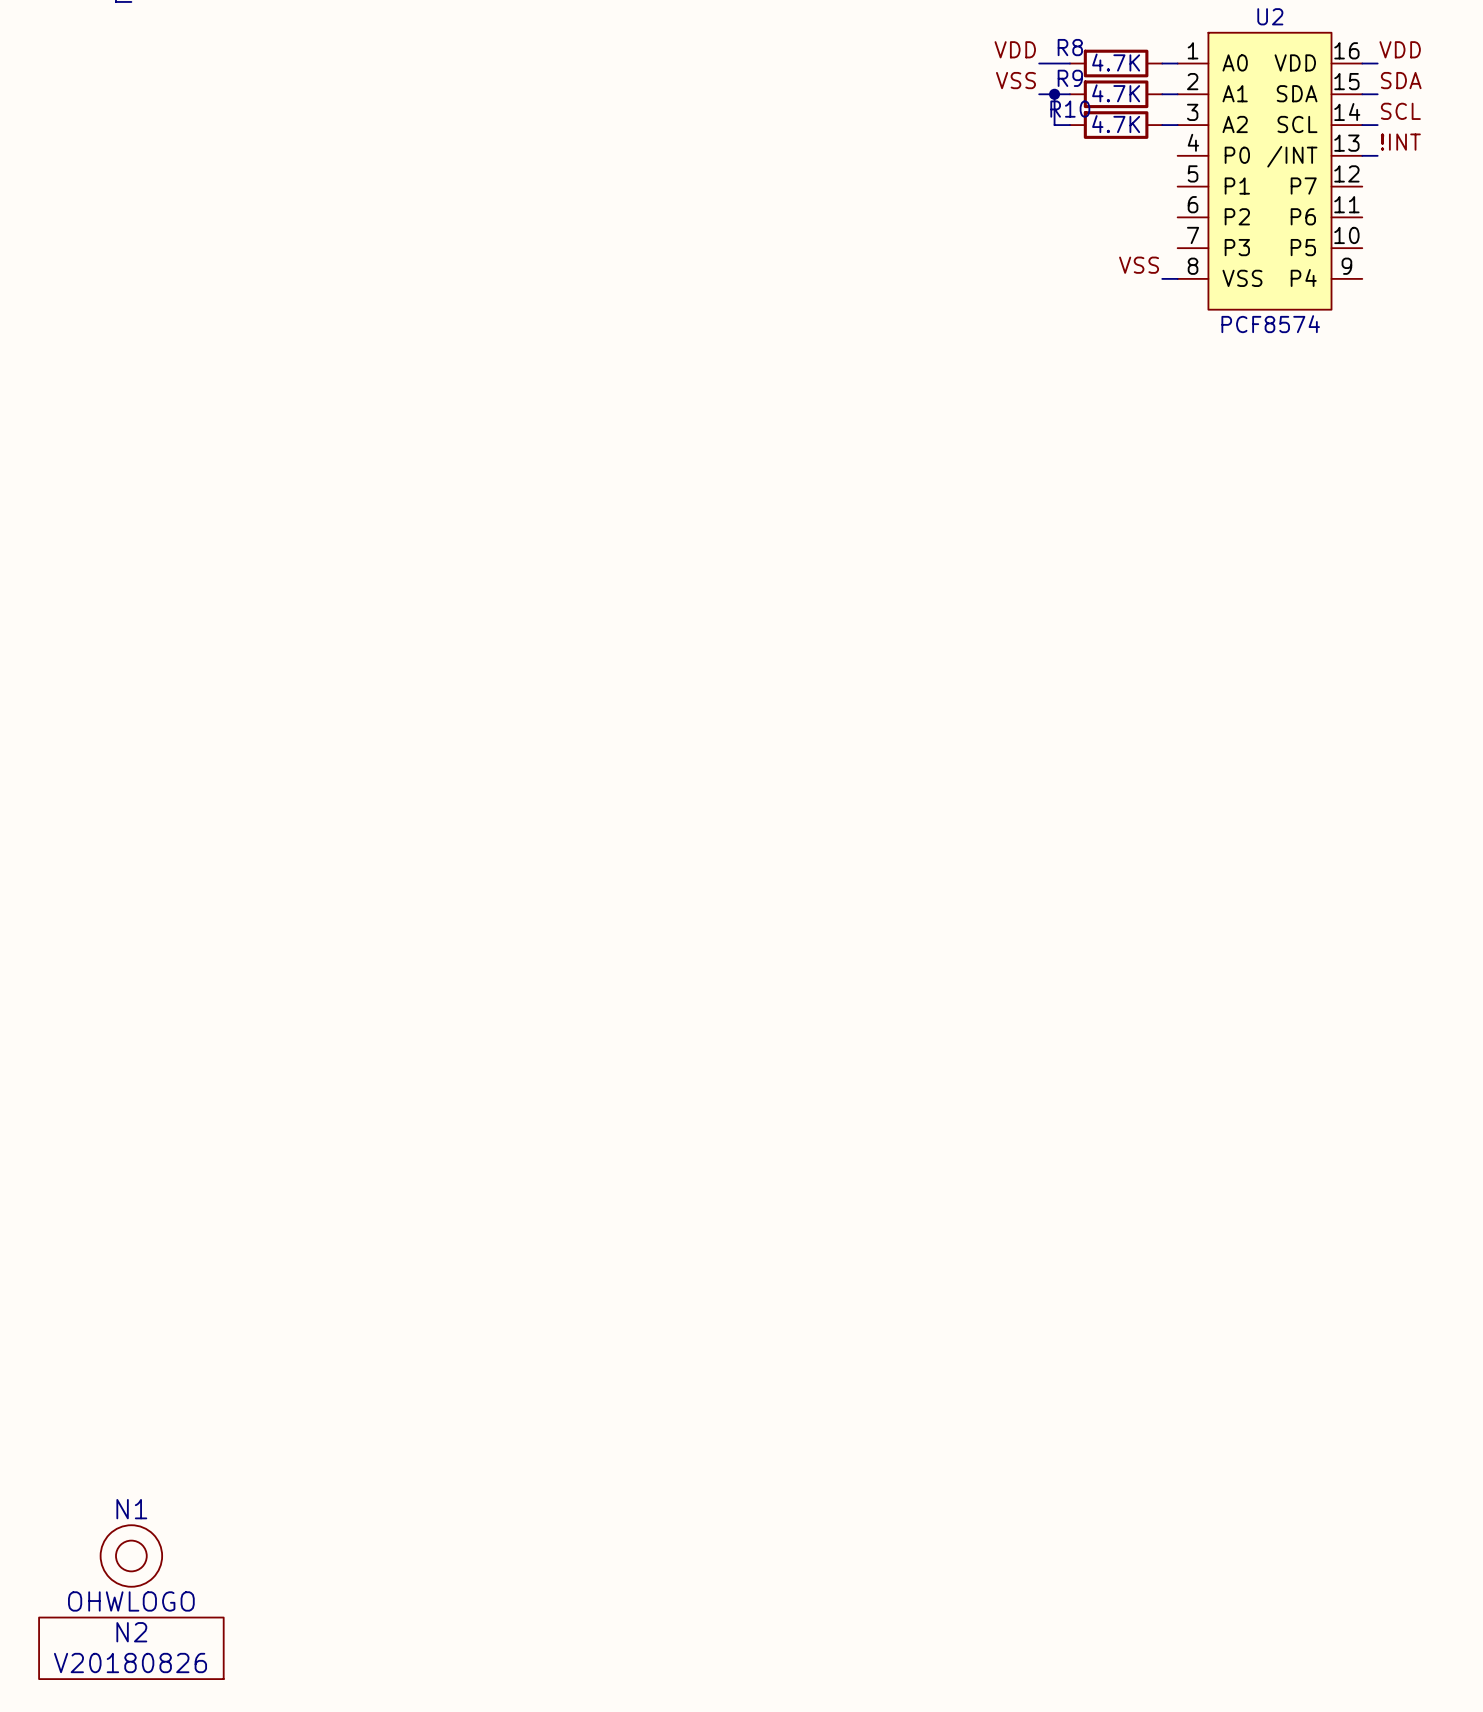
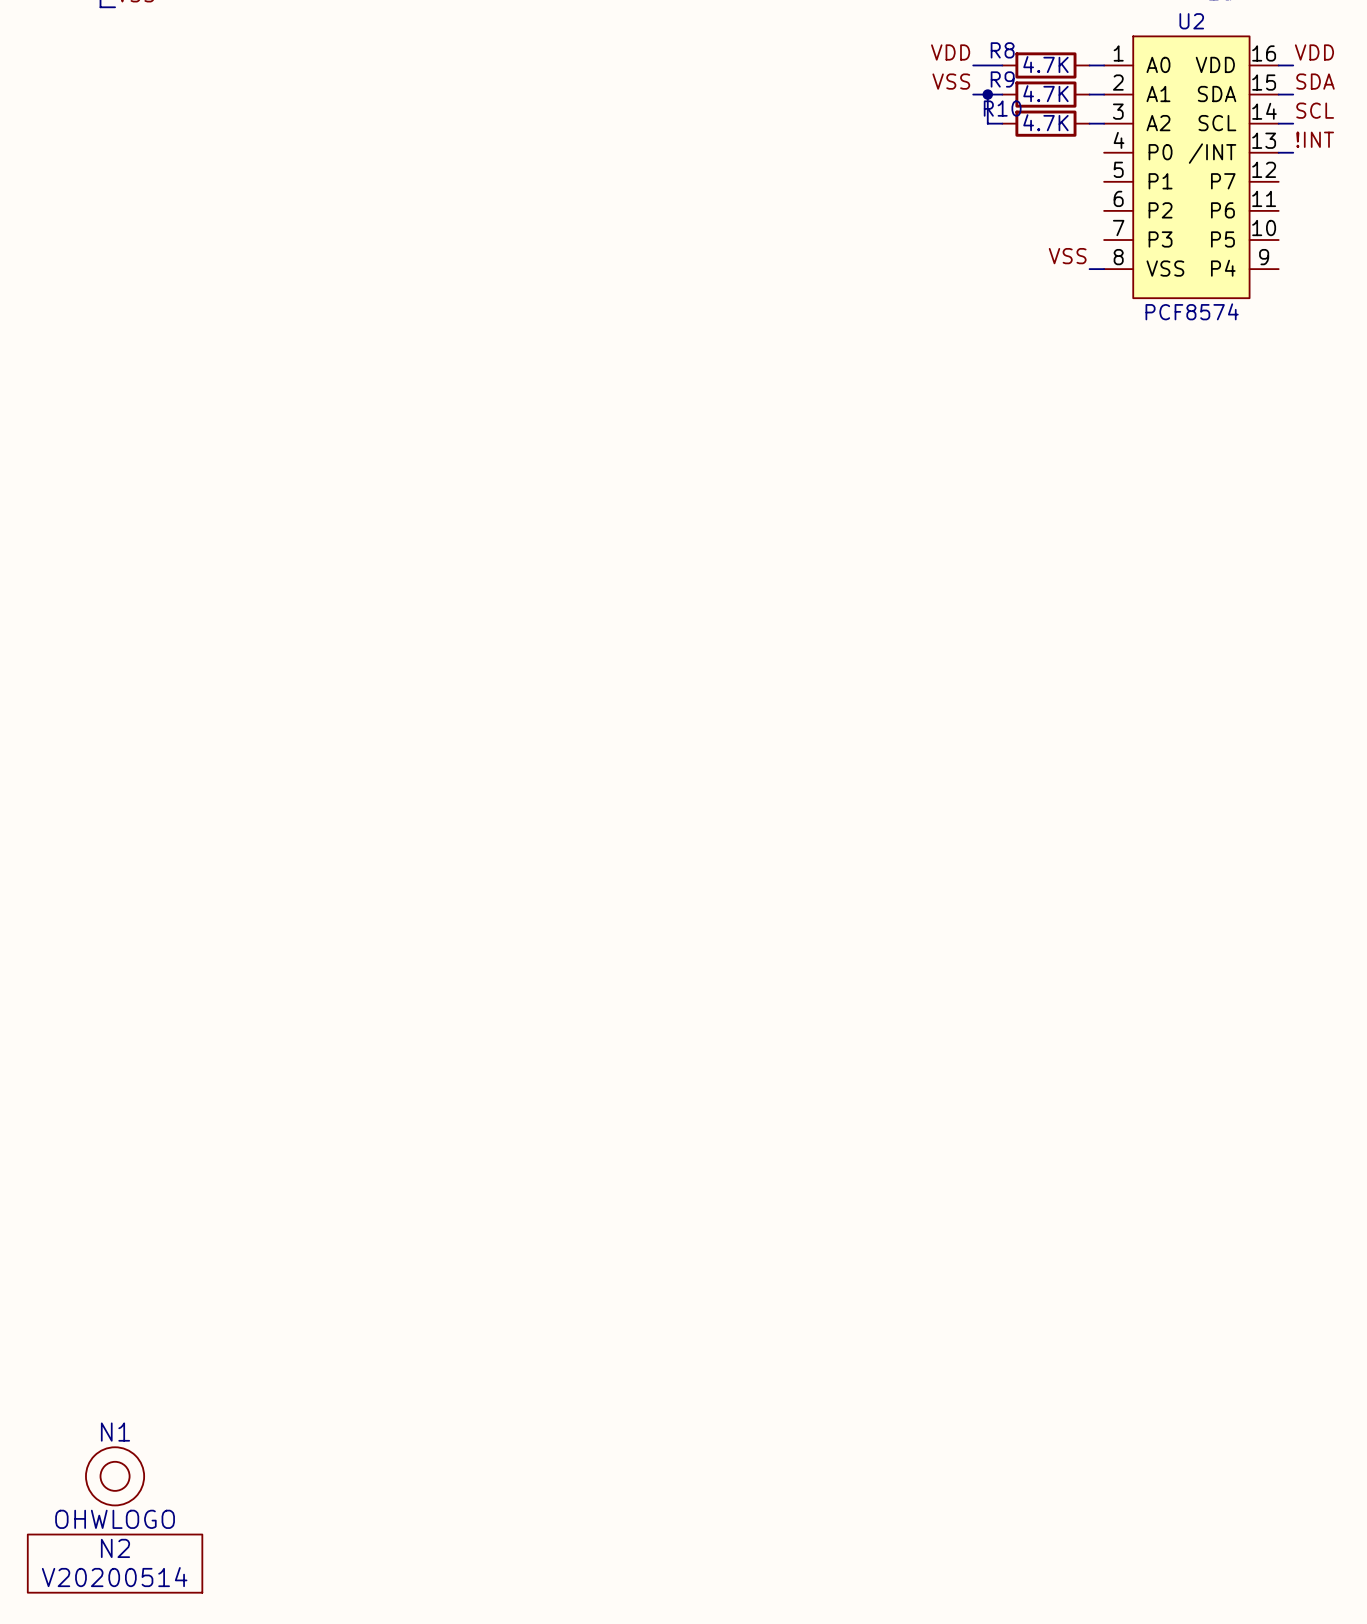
N2 value: V20180826 (130, 1663) -> V20200514 (114, 1577)

